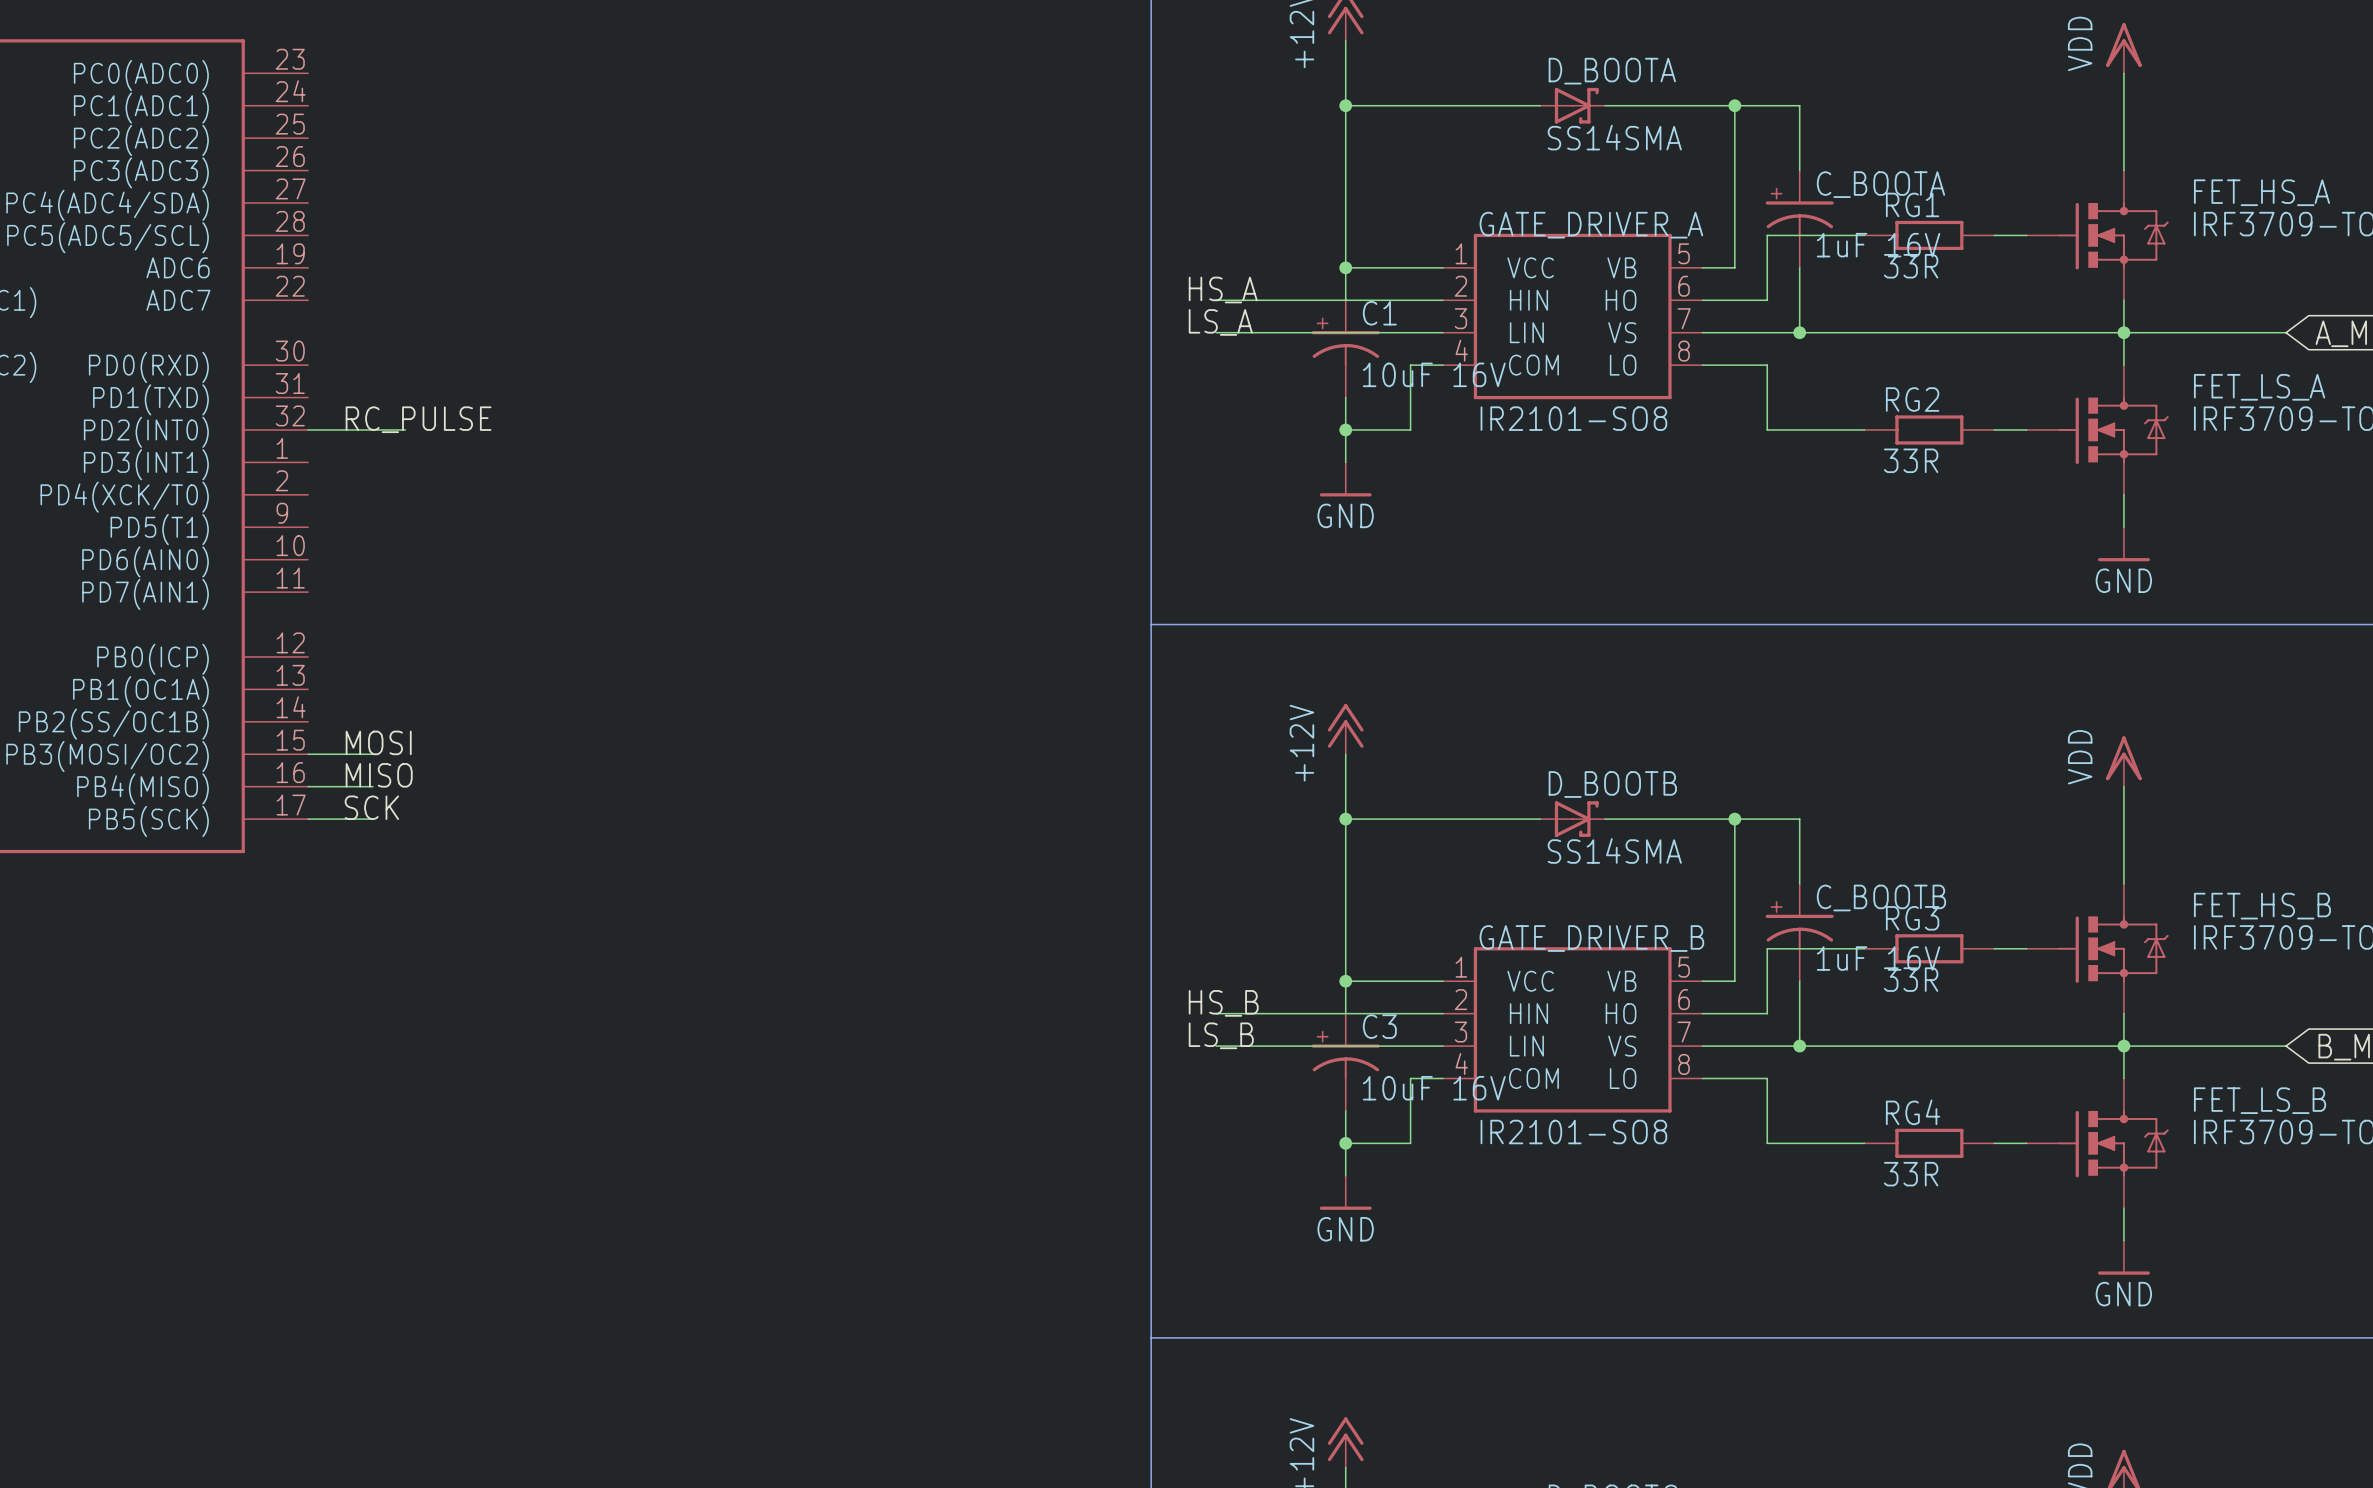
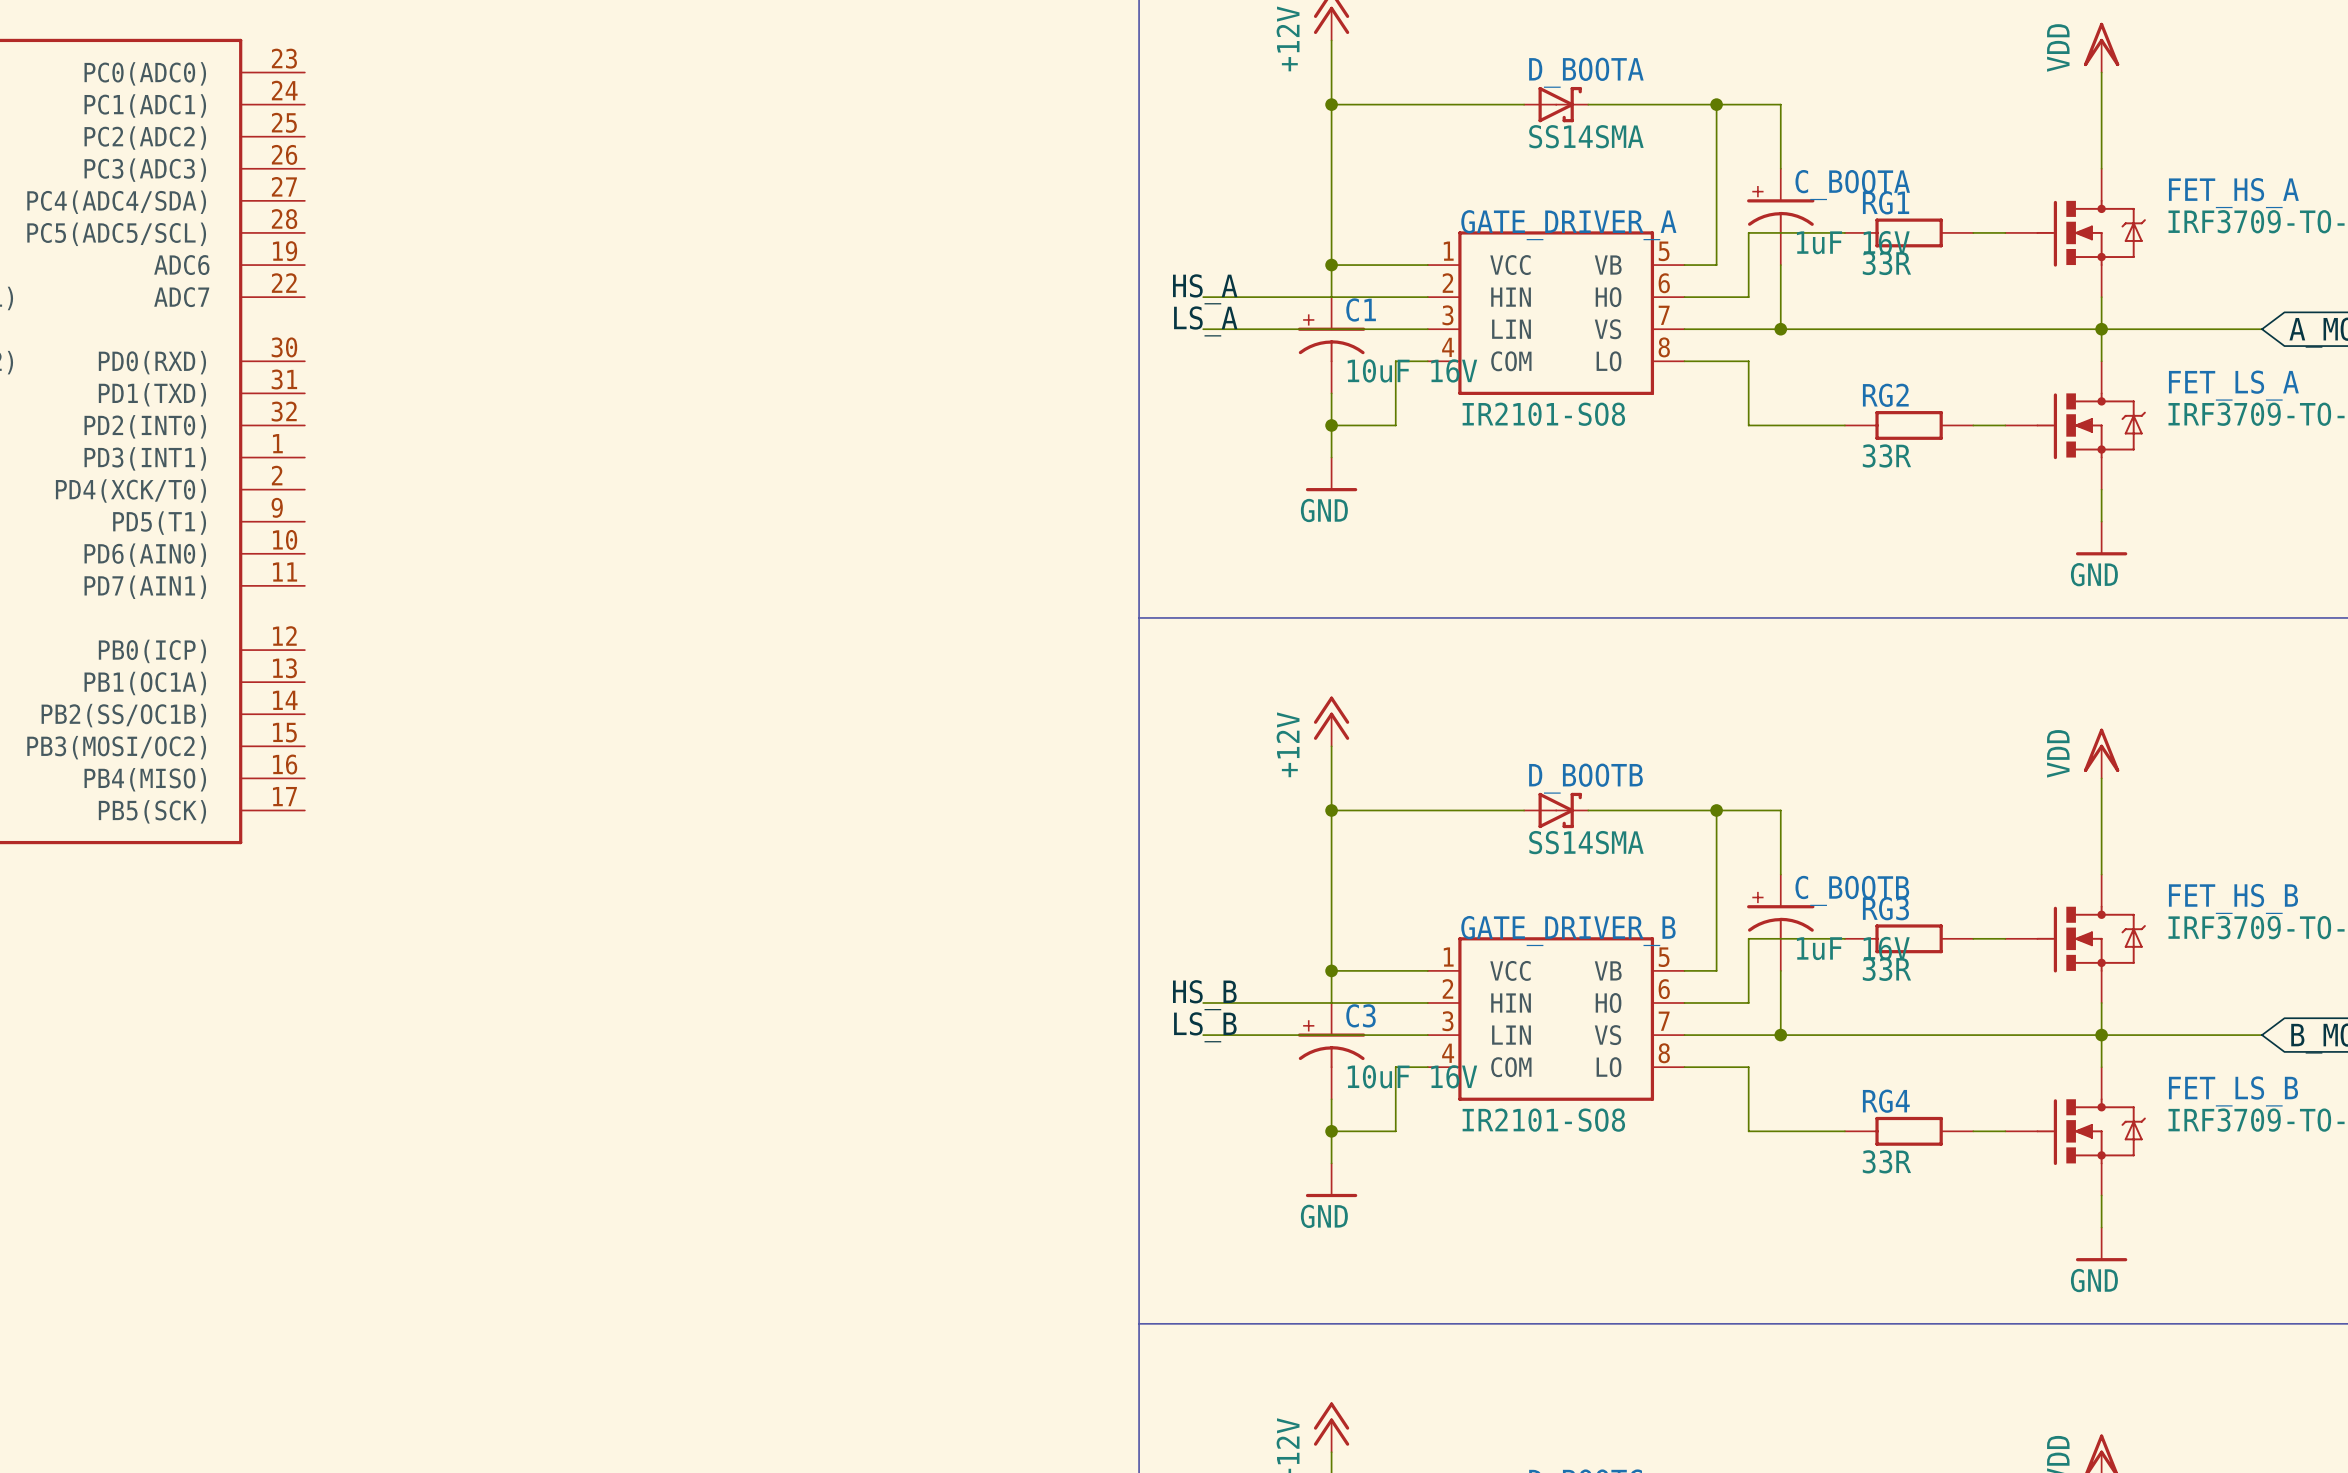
label: RC_PULSE (418, 419) -> none
wire: (308, 429) (405, 429) -> none
label: MOSI (378, 742) -> none
wire: (308, 754) (372, 754) -> none
label: MISO (379, 775) -> none
wire: (308, 786) (372, 786) -> none
label: SCK (371, 807) -> none
wire: (308, 819) (372, 819) -> none

